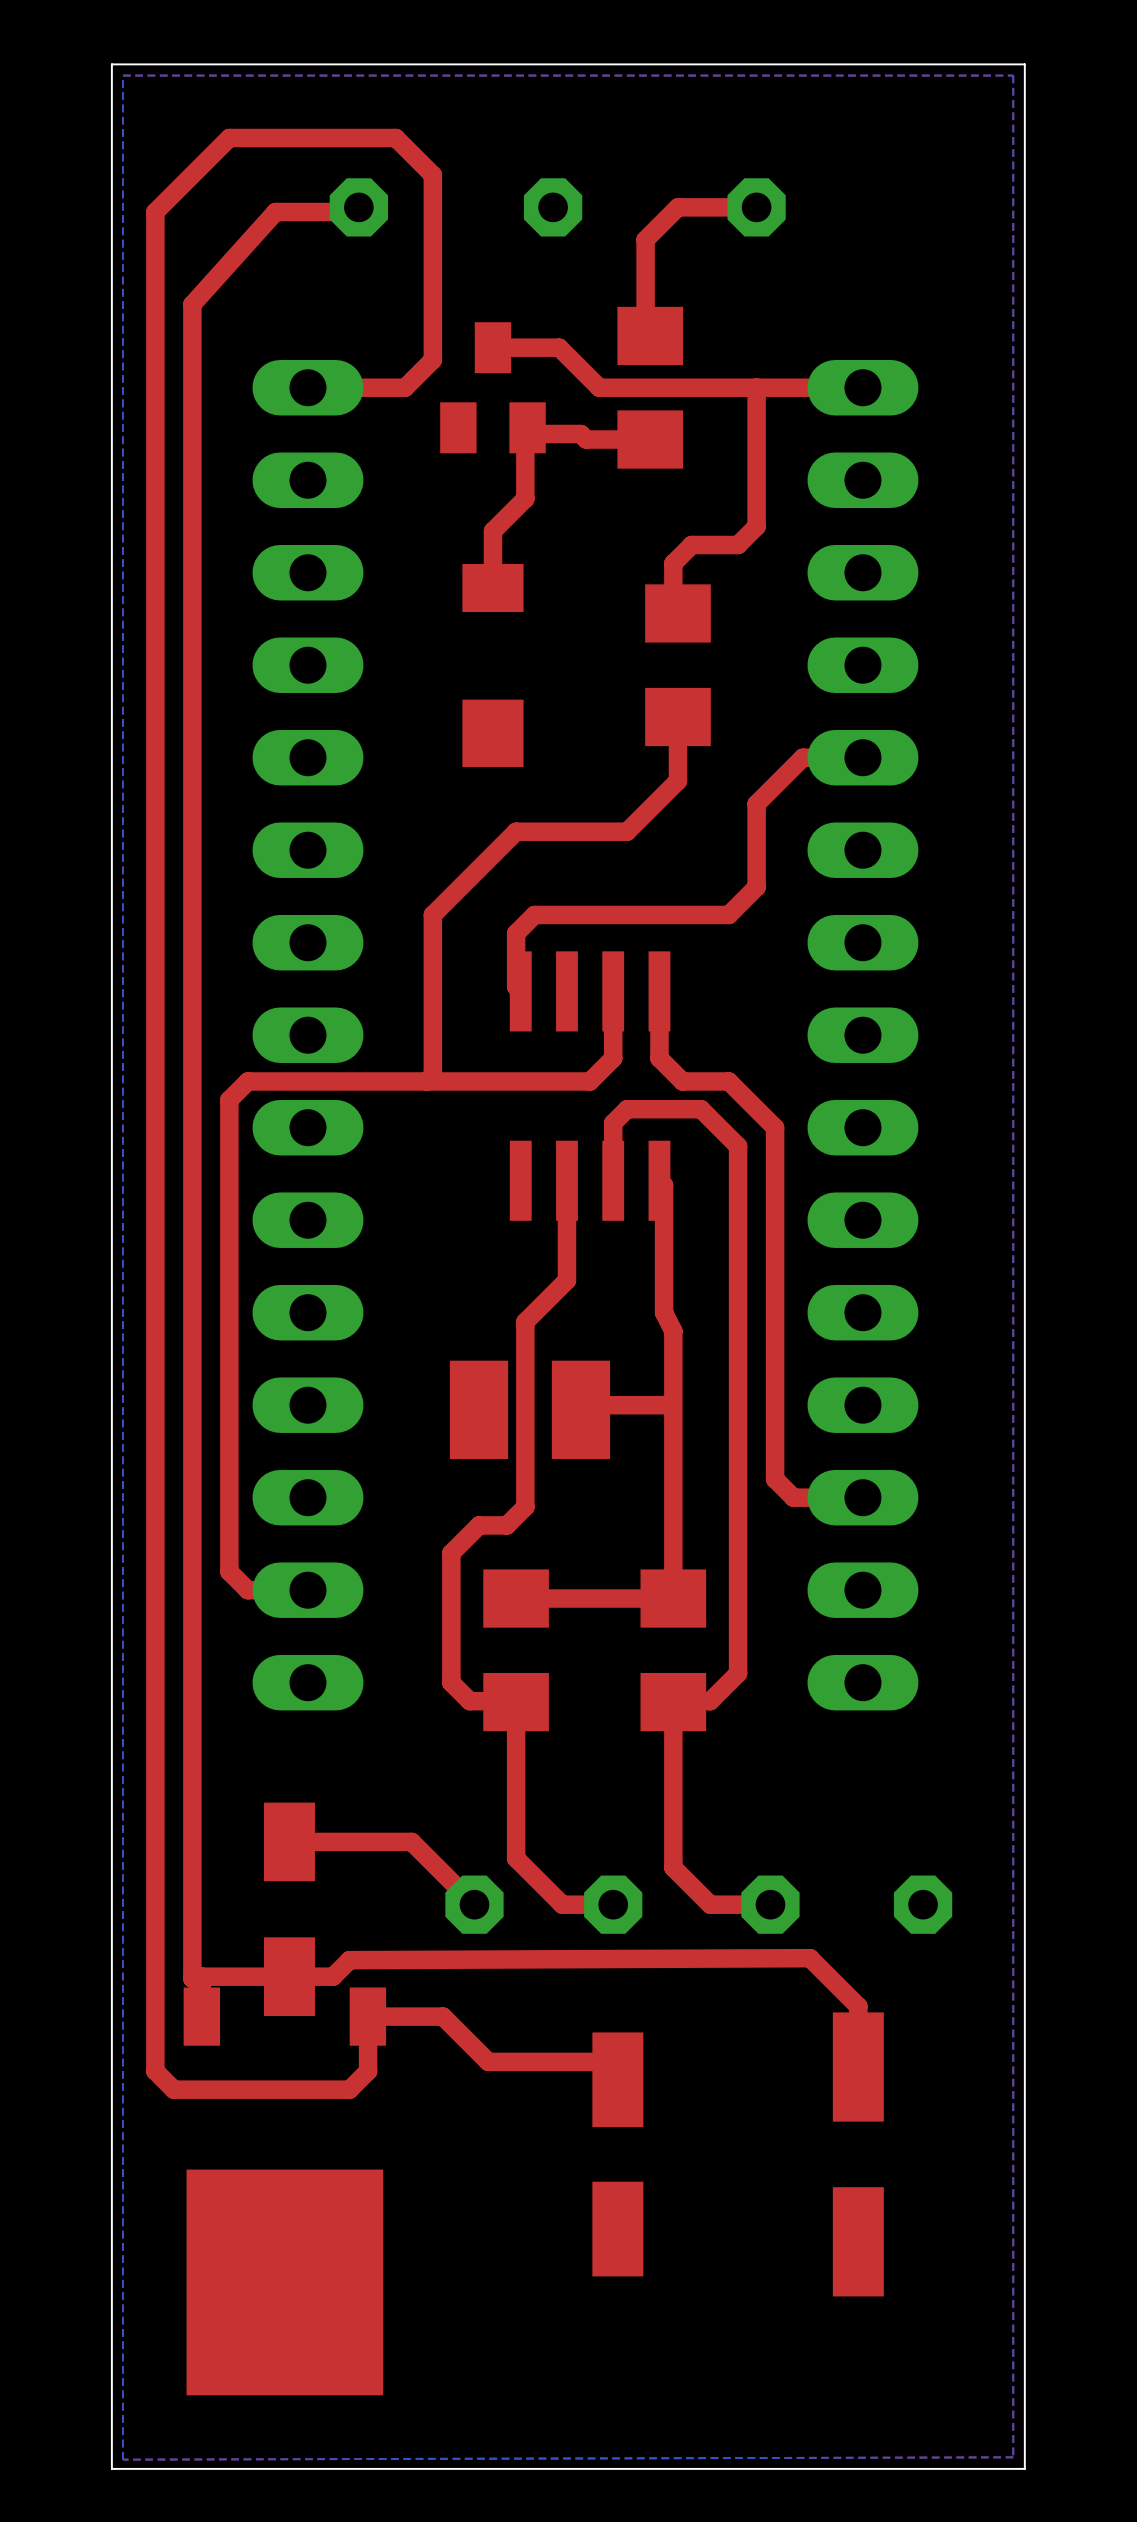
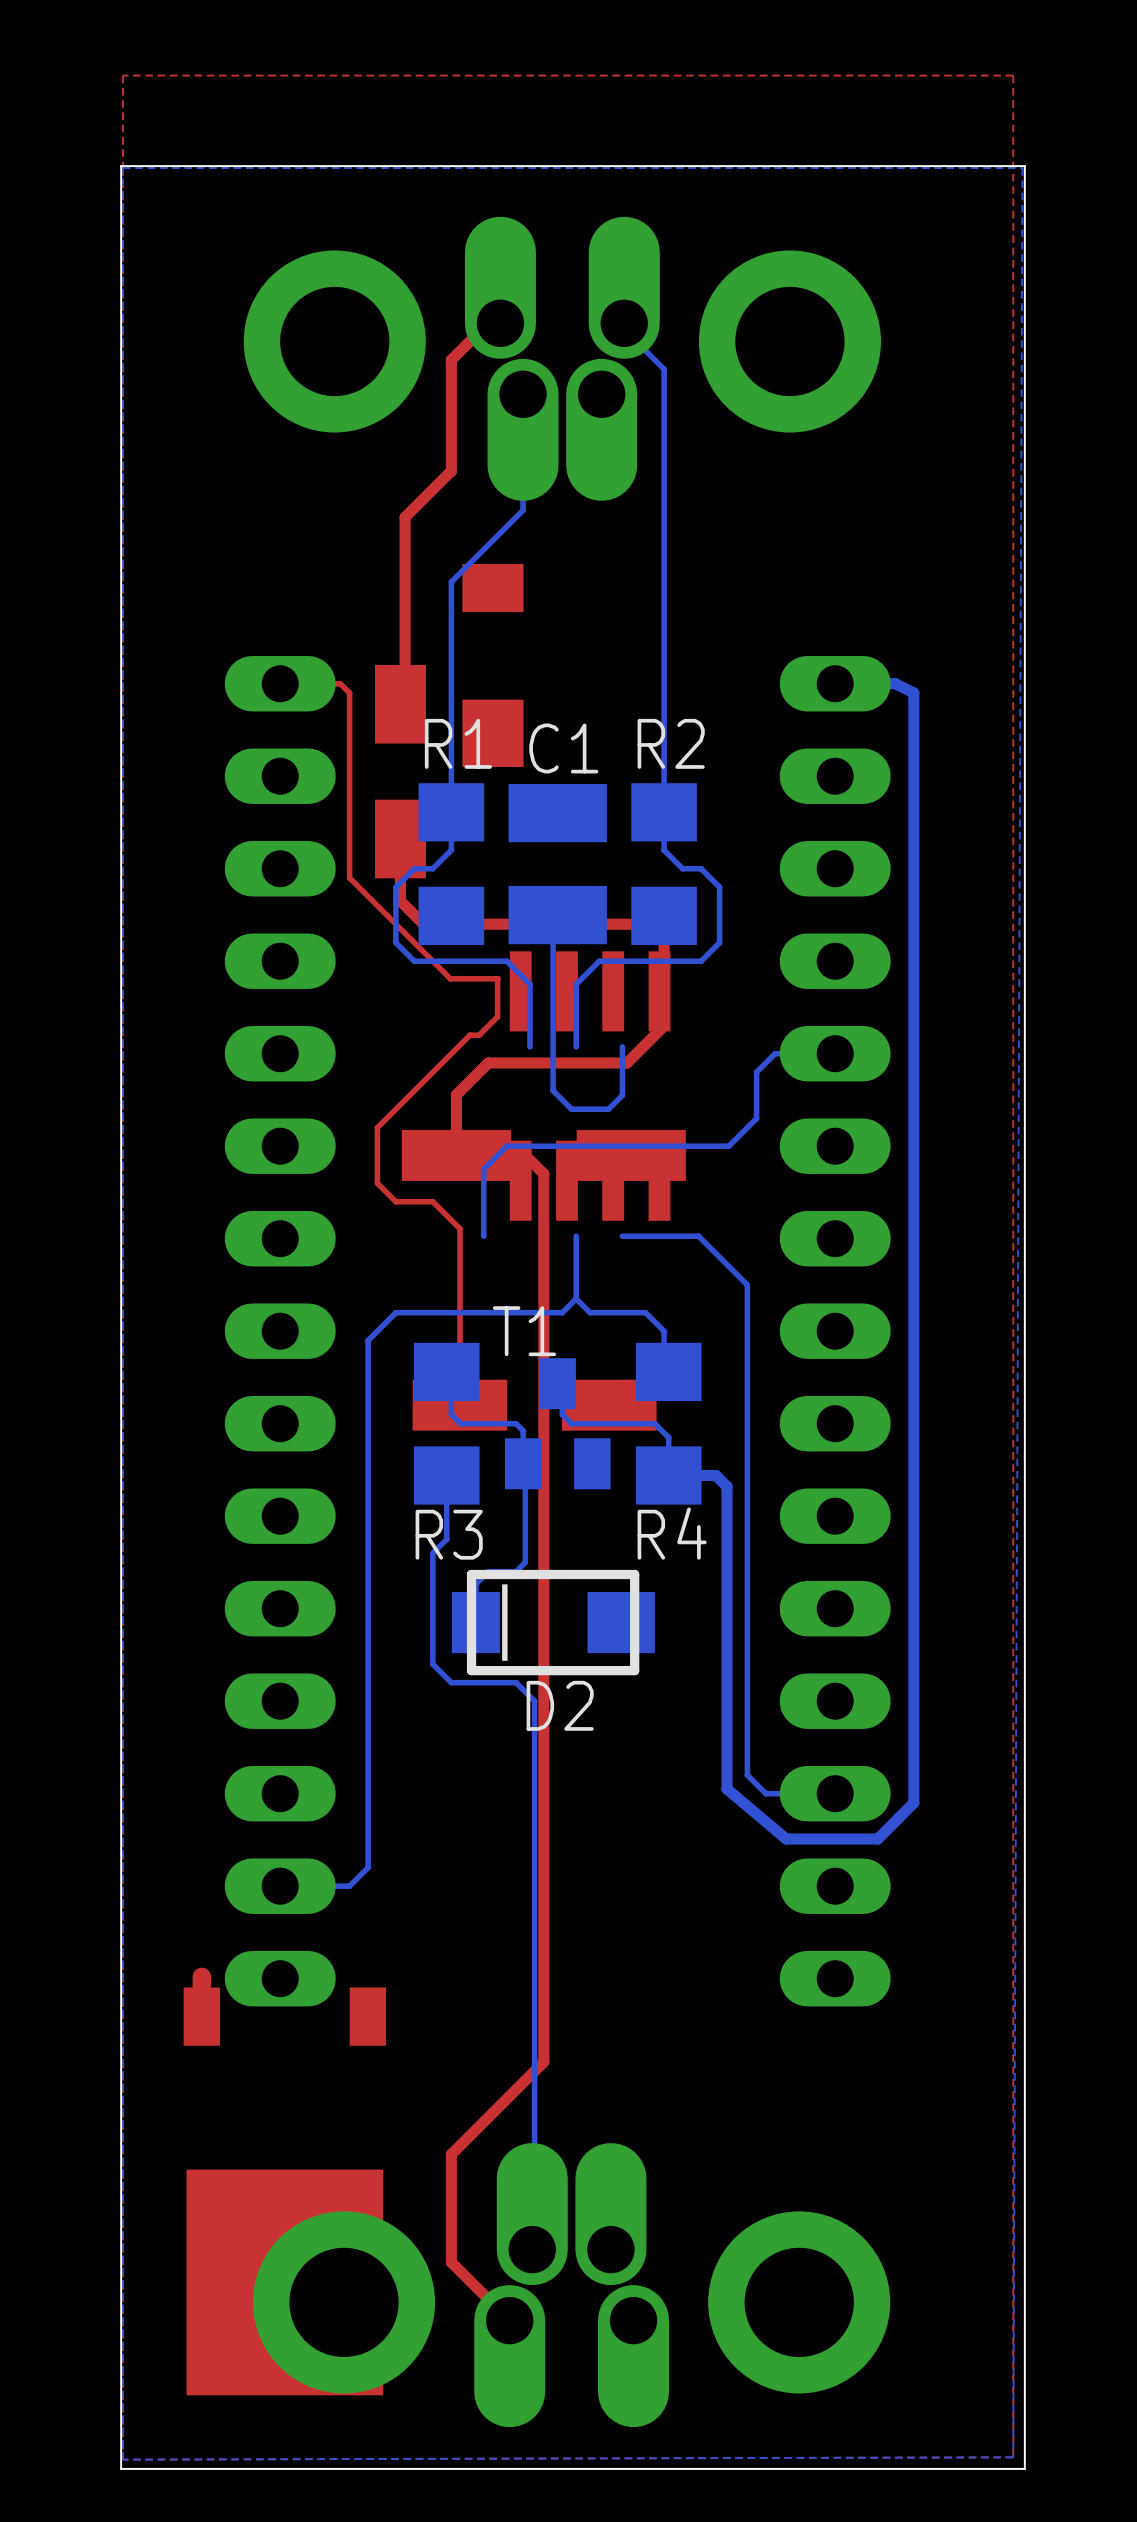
board edge: (1024, 166) (1024, 64) (111, 64) (111, 2468) (121, 2468) -> (1024, 166) (121, 166) (121, 2468)
bottom zone outline: (123, 168) (123, 75) (1013, 75) (1013, 2457) -> (123, 168) (1022, 168) (1013, 2457)
top track: (358, 207) (354, 212) (275, 212) (192, 304) (192, 1978) (201, 1976) (333, 1976) (349, 1960) (810, 1958) (858, 2006) (858, 2067) -> none
part: (358, 207) -> none
part: (553, 207) -> none
top track: (756, 207) (677, 207) (645, 239) (645, 331) (650, 335) -> none
part: (756, 207) -> none
top track: none -> (500, 323) (488, 323) (451, 360) (451, 470) (405, 517) (405, 699) (400, 704)
bottom track: none -> (624, 323) (624, 329) (664, 369) (664, 850) (682, 868) (701, 868) (719, 887) (719, 942) (701, 961) (599, 961) (576, 984) (576, 1046)
top track: (492, 347) (559, 347) (599, 387) (862, 387) -> none
part: none -> (562, 358)
top track: (307, 387) (405, 387) (432, 360) (432, 175) (395, 138) (229, 138) (155, 212) (155, 2071) (173, 2089) (349, 2089) (368, 2071) (368, 2016) -> none
part: (492, 387) -> none
part: (650, 387) -> none
top track: (756, 387) (756, 526) (738, 544) (691, 544) (673, 563) (673, 608) (677, 613) -> none
bottom track: none -> (523, 394) (523, 510) (451, 581) (451, 850) (432, 868) (414, 868) (395, 887) (395, 942) (414, 961) (506, 961) (529, 984) (529, 1046)
top track: (527, 427) (533, 433) (580, 433) (586, 439) (650, 439) -> none
top track: (531, 431) (525, 437) (525, 498) (492, 531) (492, 588) -> none
R4 side: top (677, 665) -> bottom (668, 1423)
top track: none -> (280, 683) (340, 683) (349, 692) (349, 877) (450, 978) (497, 978)
bottom track: none -> (835, 683) (895, 683) (913, 692) (913, 1802) (877, 1839) (786, 1839) (726, 1789) (726, 1486) (715, 1475) (668, 1475) (668, 1437) (654, 1423) (571, 1423) (562, 1414) (562, 1388) (557, 1383)
top track: (677, 717) (677, 780) (627, 831) (516, 831) (432, 914) (432, 1075) (426, 1081) -> none
top track: (862, 757) (802, 757) (756, 803) (756, 887) (728, 914) (534, 914) (516, 933) (516, 986) (520, 991) -> none
part: none -> (400, 771)
top track: none -> (400, 838) (400, 901) (423, 924) (645, 924) (664, 942) (664, 1025) (627, 1062) (488, 1062) (456, 1094) (456, 1155) (525, 1155) (543, 1173) (543, 2061) (451, 2154) (451, 2262) (509, 2320)
C1: none -> (557, 864)
bottom track: none -> (553, 921) (558, 915) (557, 915) (553, 919) (553, 1090) (571, 1109) (608, 1109) (622, 1095) (622, 1046)
top track: none -> (497, 978) (497, 1016) (479, 1035) (469, 1035) (377, 1127) (377, 1183) (395, 1201) (432, 1201) (459, 1228) (459, 1405)
top track: (613, 991) (613, 1058) (590, 1081) (247, 1081) (229, 1099) (229, 1571) (247, 1590) (307, 1590) -> none
top track: (659, 991) (659, 1058) (682, 1081) (728, 1081) (775, 1127) (775, 1479) (793, 1497) (862, 1497) -> none
part position: (307, 1035) -> (280, 1331)
part position: (862, 1035) -> (835, 1331)
bottom track: none -> (835, 1053) (775, 1053) (756, 1072) (756, 1118) (728, 1146) (506, 1146) (483, 1169) (483, 1236)
part: none -> (543, 1155)
top track: (566, 1180) (566, 1280) (525, 1321) (525, 1506) (506, 1525) (479, 1525) (451, 1553) (451, 1682) (469, 1701) (516, 1702) (516, 1858) (562, 1904) (613, 1904) -> none
top track: (613, 1180) (613, 1123) (627, 1109) (701, 1109) (738, 1146) (738, 1673) (710, 1701) (673, 1702) (673, 1867) (710, 1904) (770, 1904) -> none
top track: (659, 1180) (664, 1185) (664, 1312) (673, 1331) (673, 1598) -> none
bottom track: none -> (576, 1236) (576, 1298)
bottom track: none -> (622, 1236) (698, 1236) (747, 1284) (747, 1775) (765, 1793) (835, 1793)
bottom track: none -> (576, 1298) (590, 1312) (645, 1312) (664, 1331) (664, 1367) (668, 1371)
bottom track: none -> (576, 1298) (562, 1312) (395, 1312) (368, 1340) (368, 1867) (349, 1886) (280, 1886)
part footprint: [449, 1360, 611, 1459] -> [412, 1379, 657, 1431]
bottom track: none -> (446, 1371) (451, 1376) (451, 1414) (460, 1423) (516, 1423) (523, 1430) (523, 1463) (525, 1465) (525, 1562) (516, 1571) (488, 1571) (475, 1584) (475, 1622)
top track: (664, 1405) (585, 1405) (580, 1409) -> none
R3: none -> (446, 1423)
T1: none -> (557, 1423)
bottom track: none -> (446, 1475) (446, 1539) (432, 1553) (432, 1664) (451, 1682) (516, 1682) (534, 1701) (534, 2247) (532, 2249)
top track: (673, 1598) (516, 1598) -> none
D2: none -> (553, 1622)
R1 side: top (516, 1650) -> bottom (451, 864)
R2 side: top (673, 1650) -> bottom (664, 864)
top track: (289, 1841) (411, 1841) (474, 1904) -> none
part: (474, 1904) -> none
part: (613, 1904) -> none
part: (770, 1904) -> none
part: (923, 1904) -> none
part: (289, 1909) -> none
top track: (367, 2016) (443, 2016) (488, 2061) (612, 2061) (617, 2079) -> none
part: (617, 2154) -> none
part: (858, 2154) -> none
part: none -> (571, 2285)

